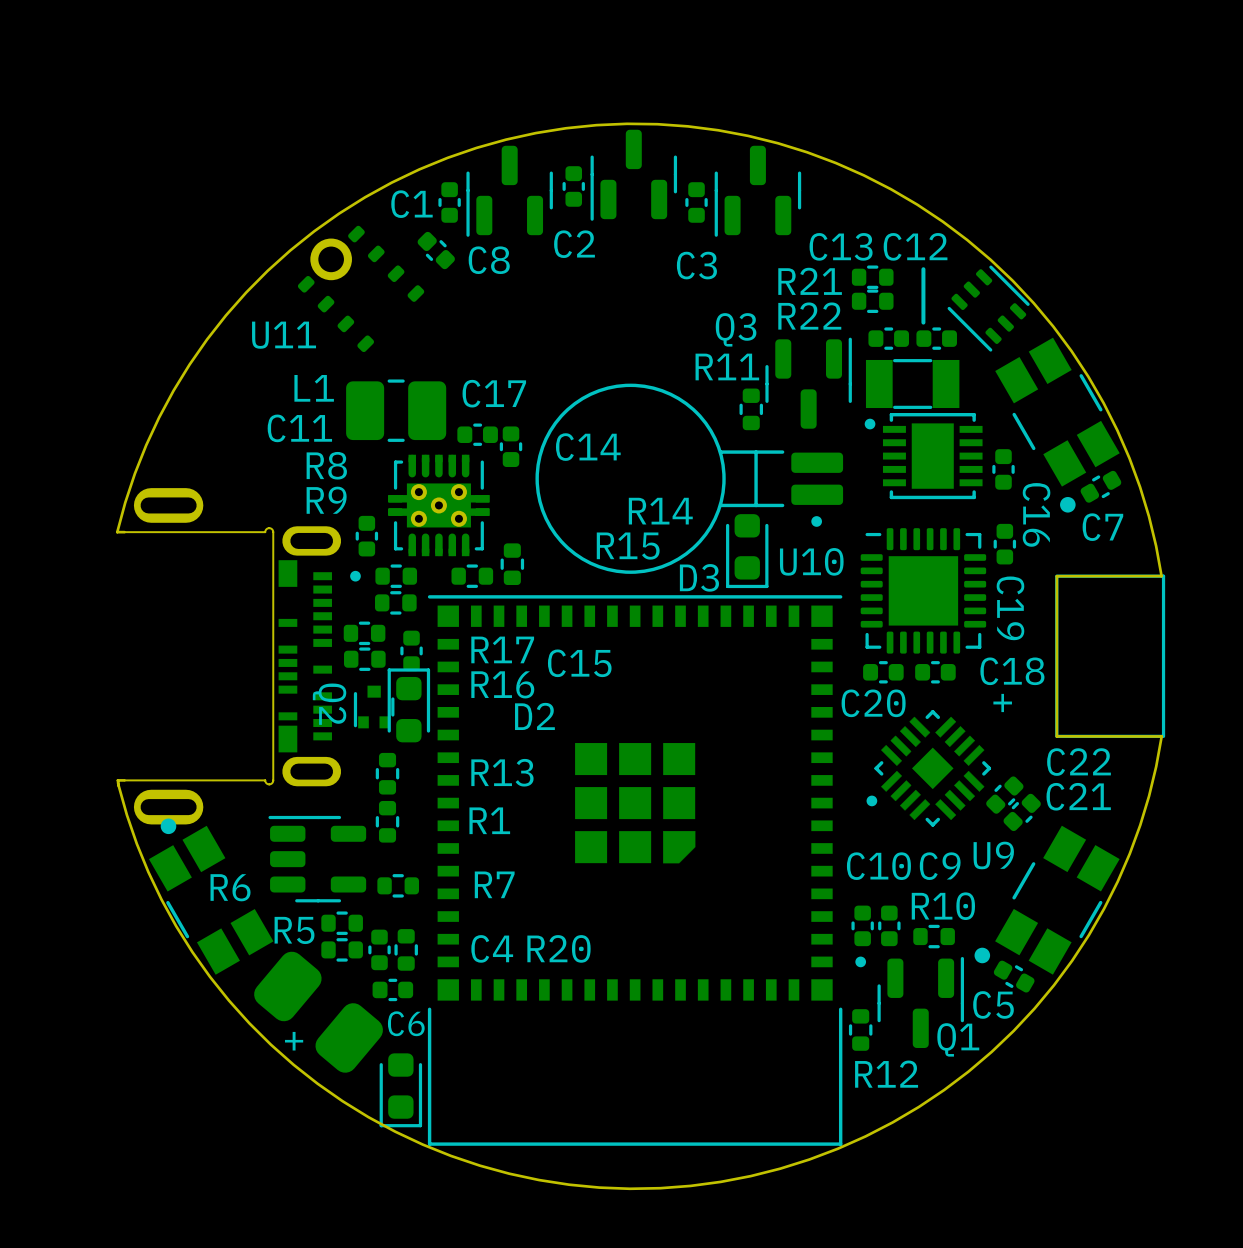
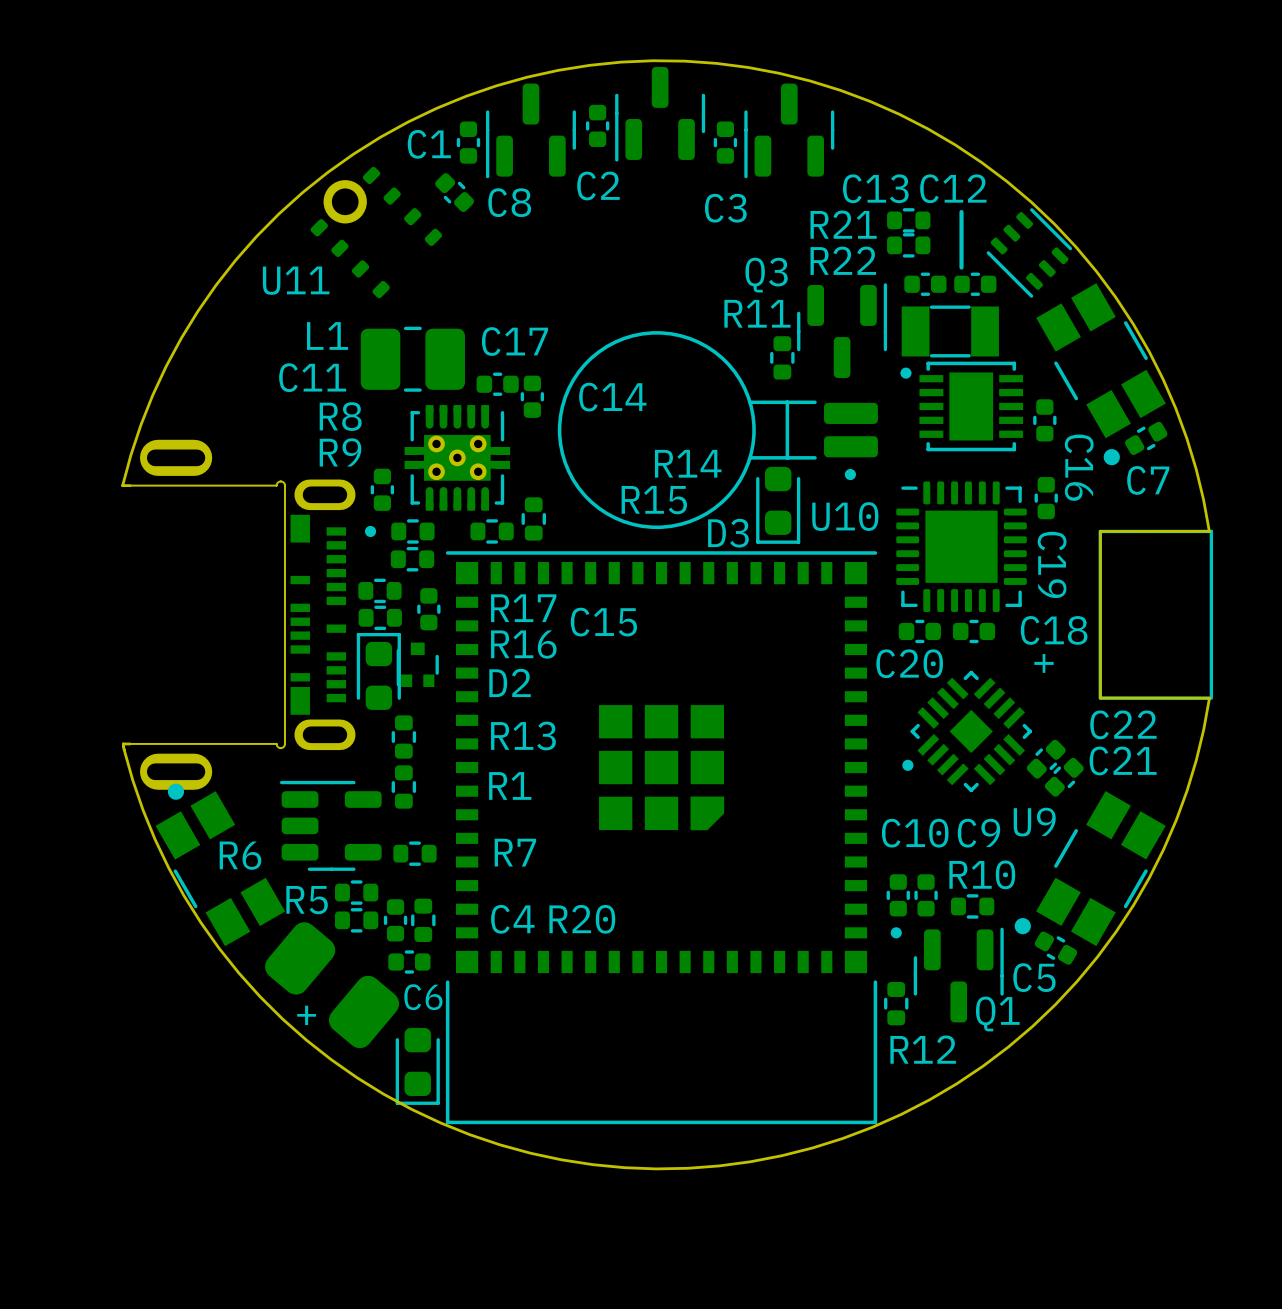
part: none -> (417, 664)
D2 position: (408, 705) -> (378, 671)
Q2: (374, 706) -> none

